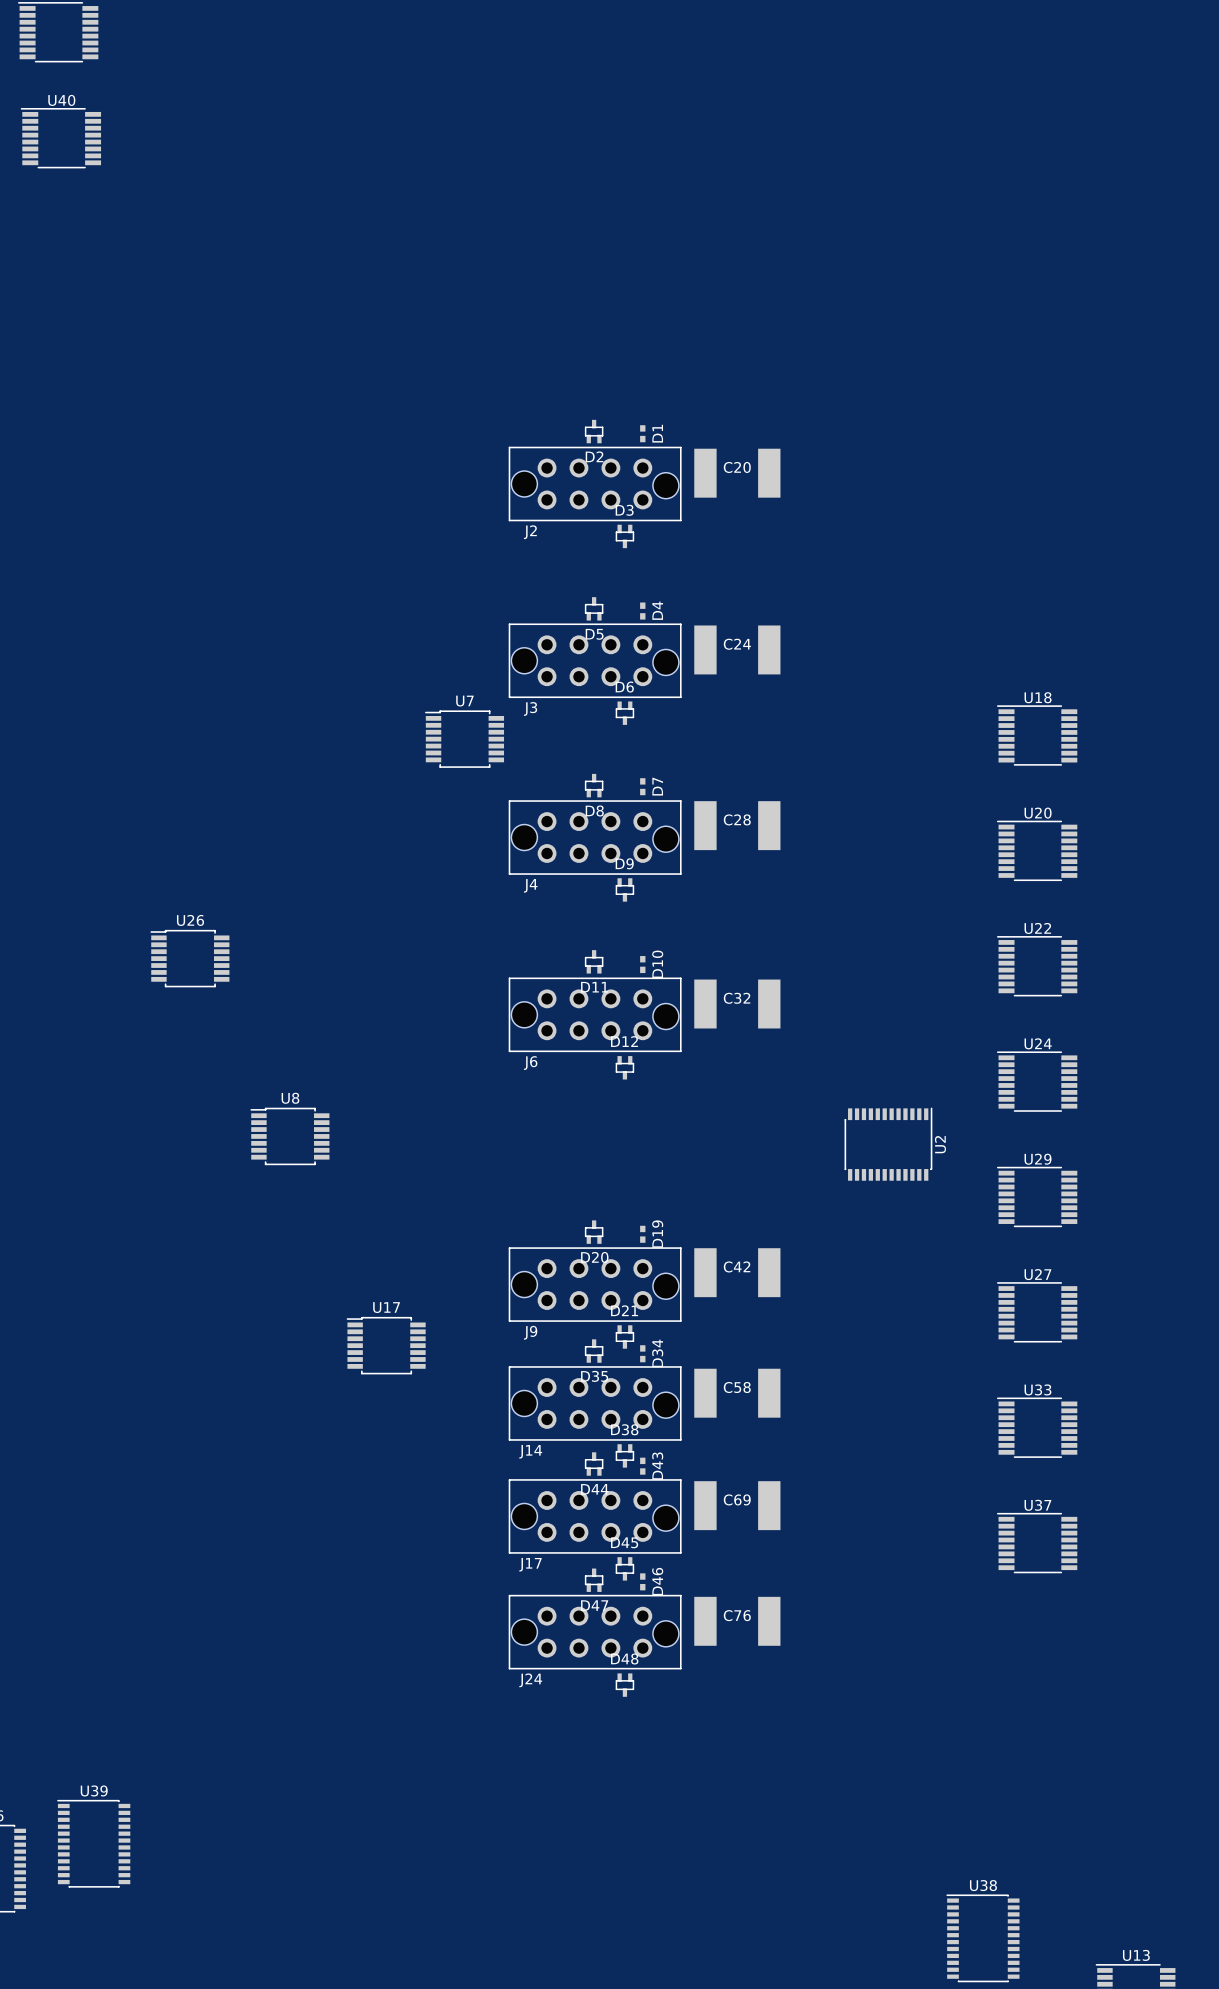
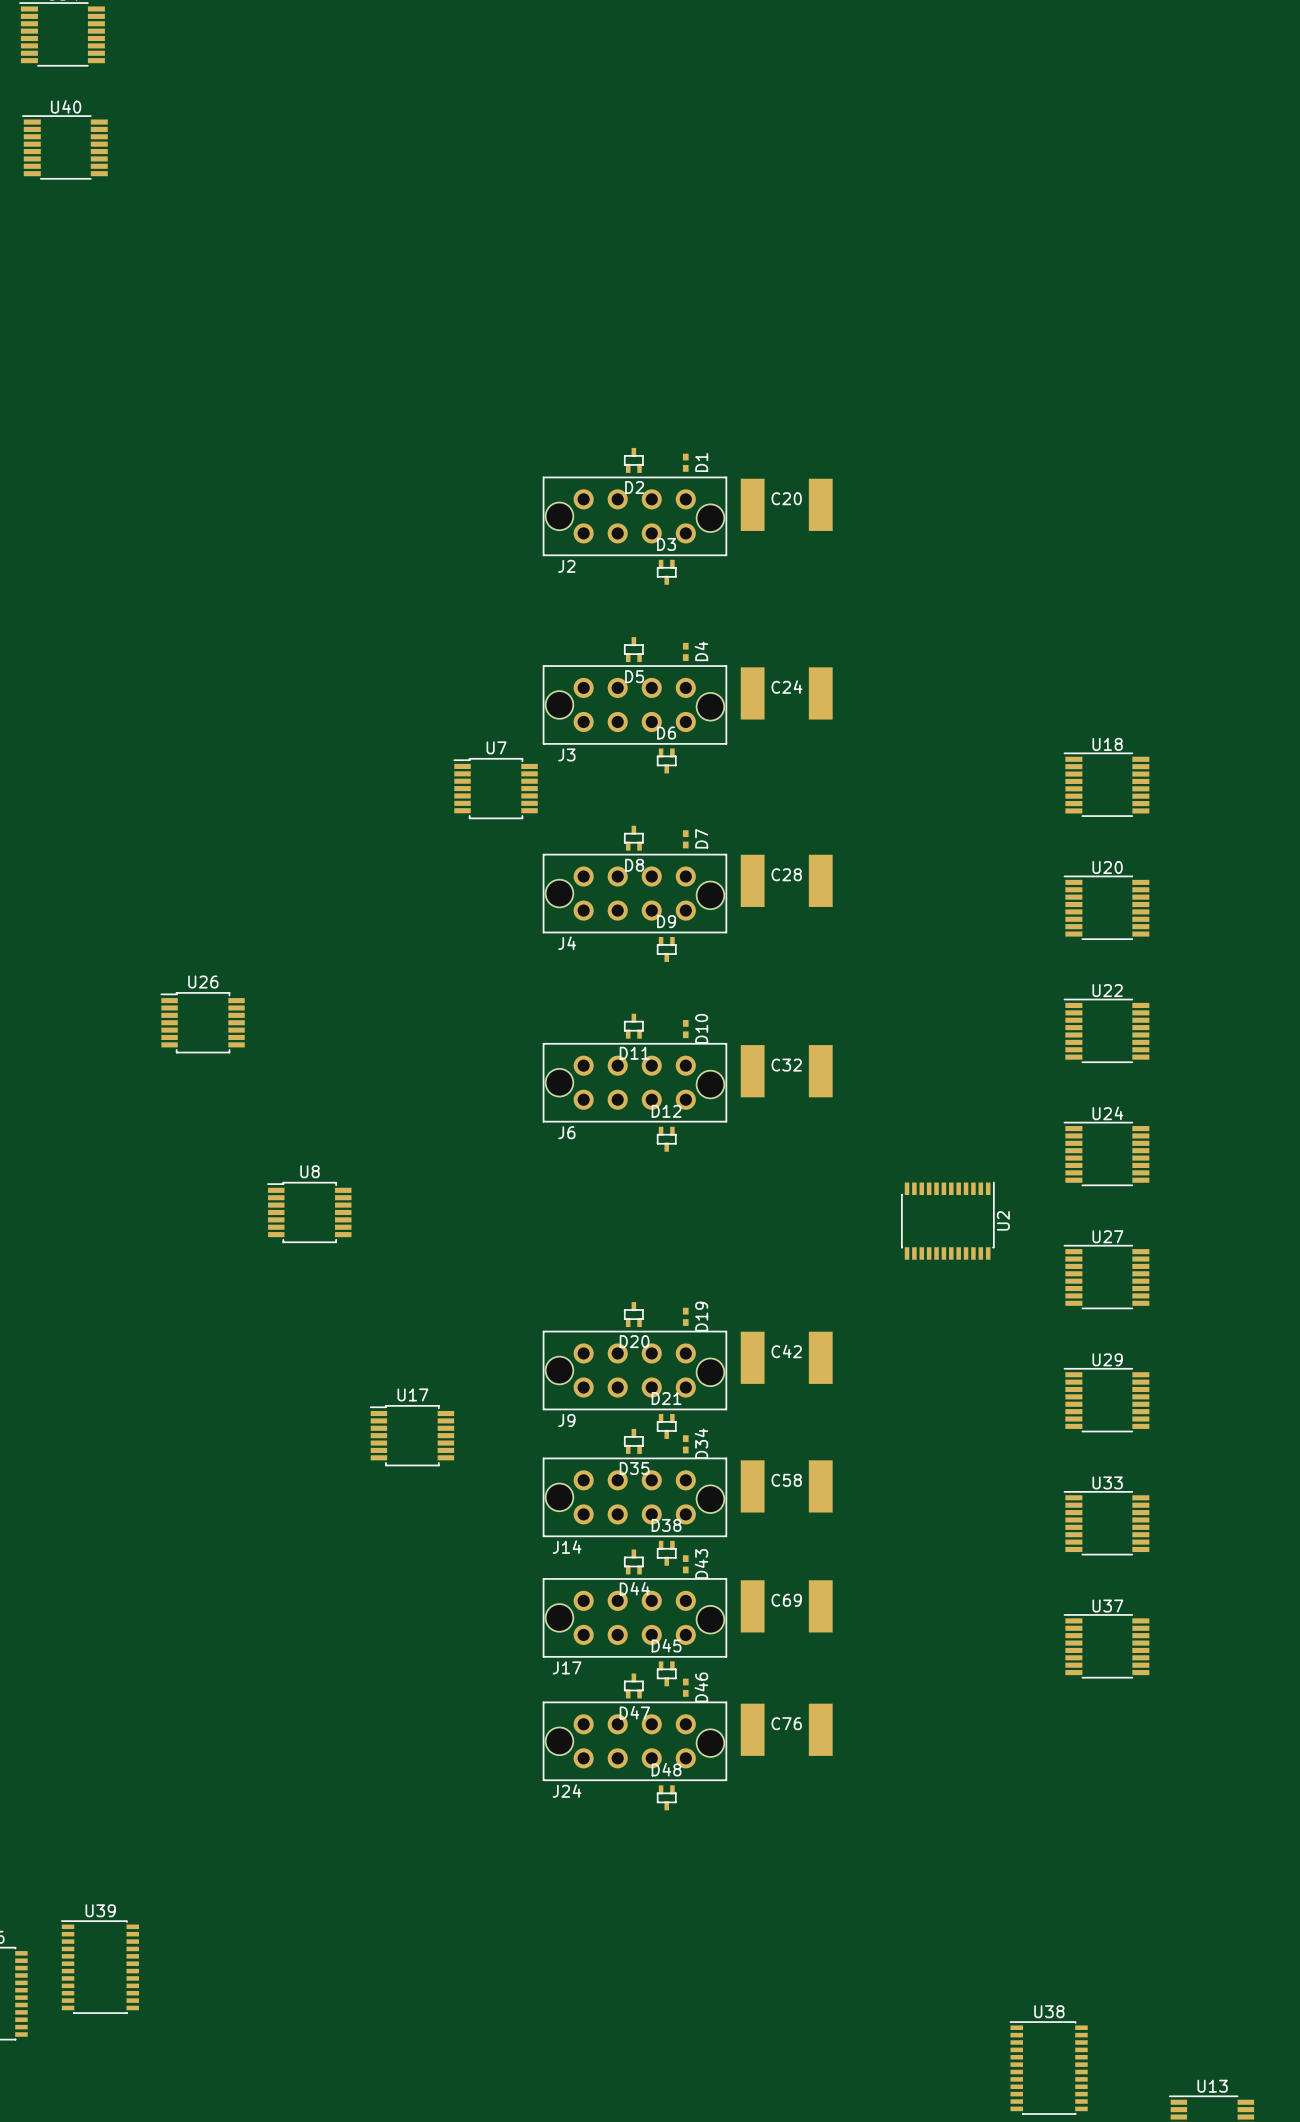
U29 name: U29 (1038, 1159) -> U27 (1107, 1236)
U27 name: U27 (1037, 1274) -> U29 (1107, 1359)

